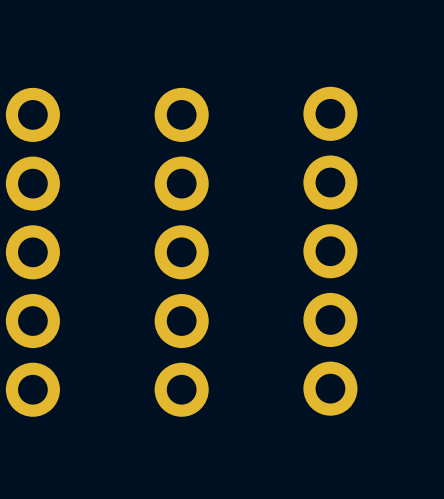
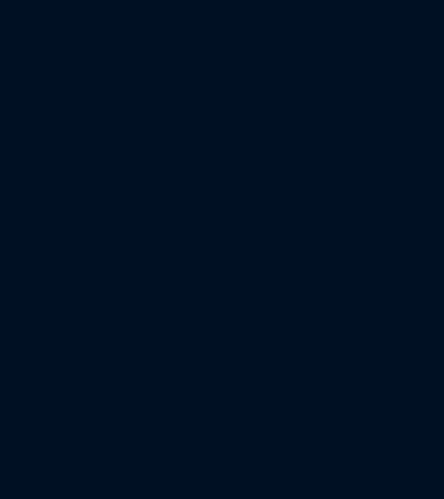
part: (330, 251) -> none
part: (32, 252) -> none
part: (181, 252) -> none

